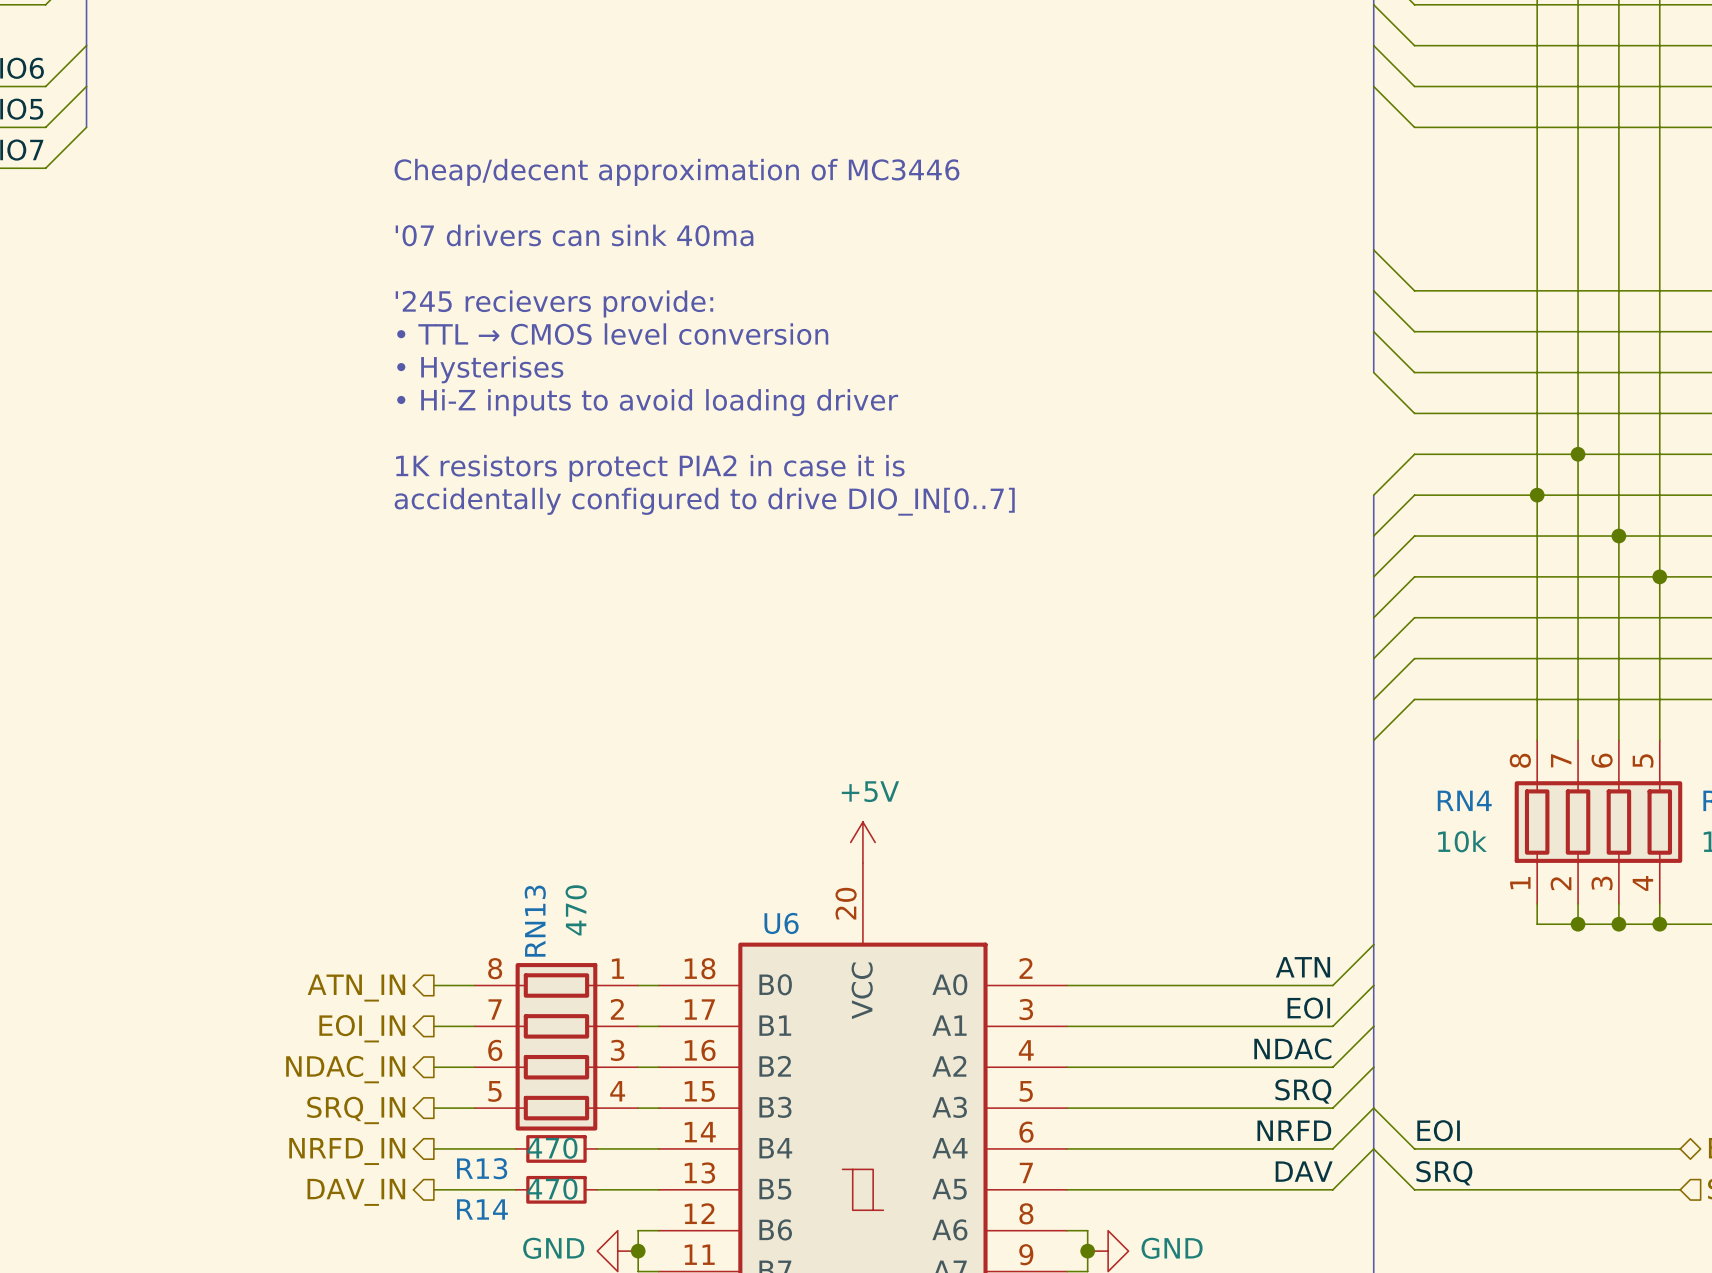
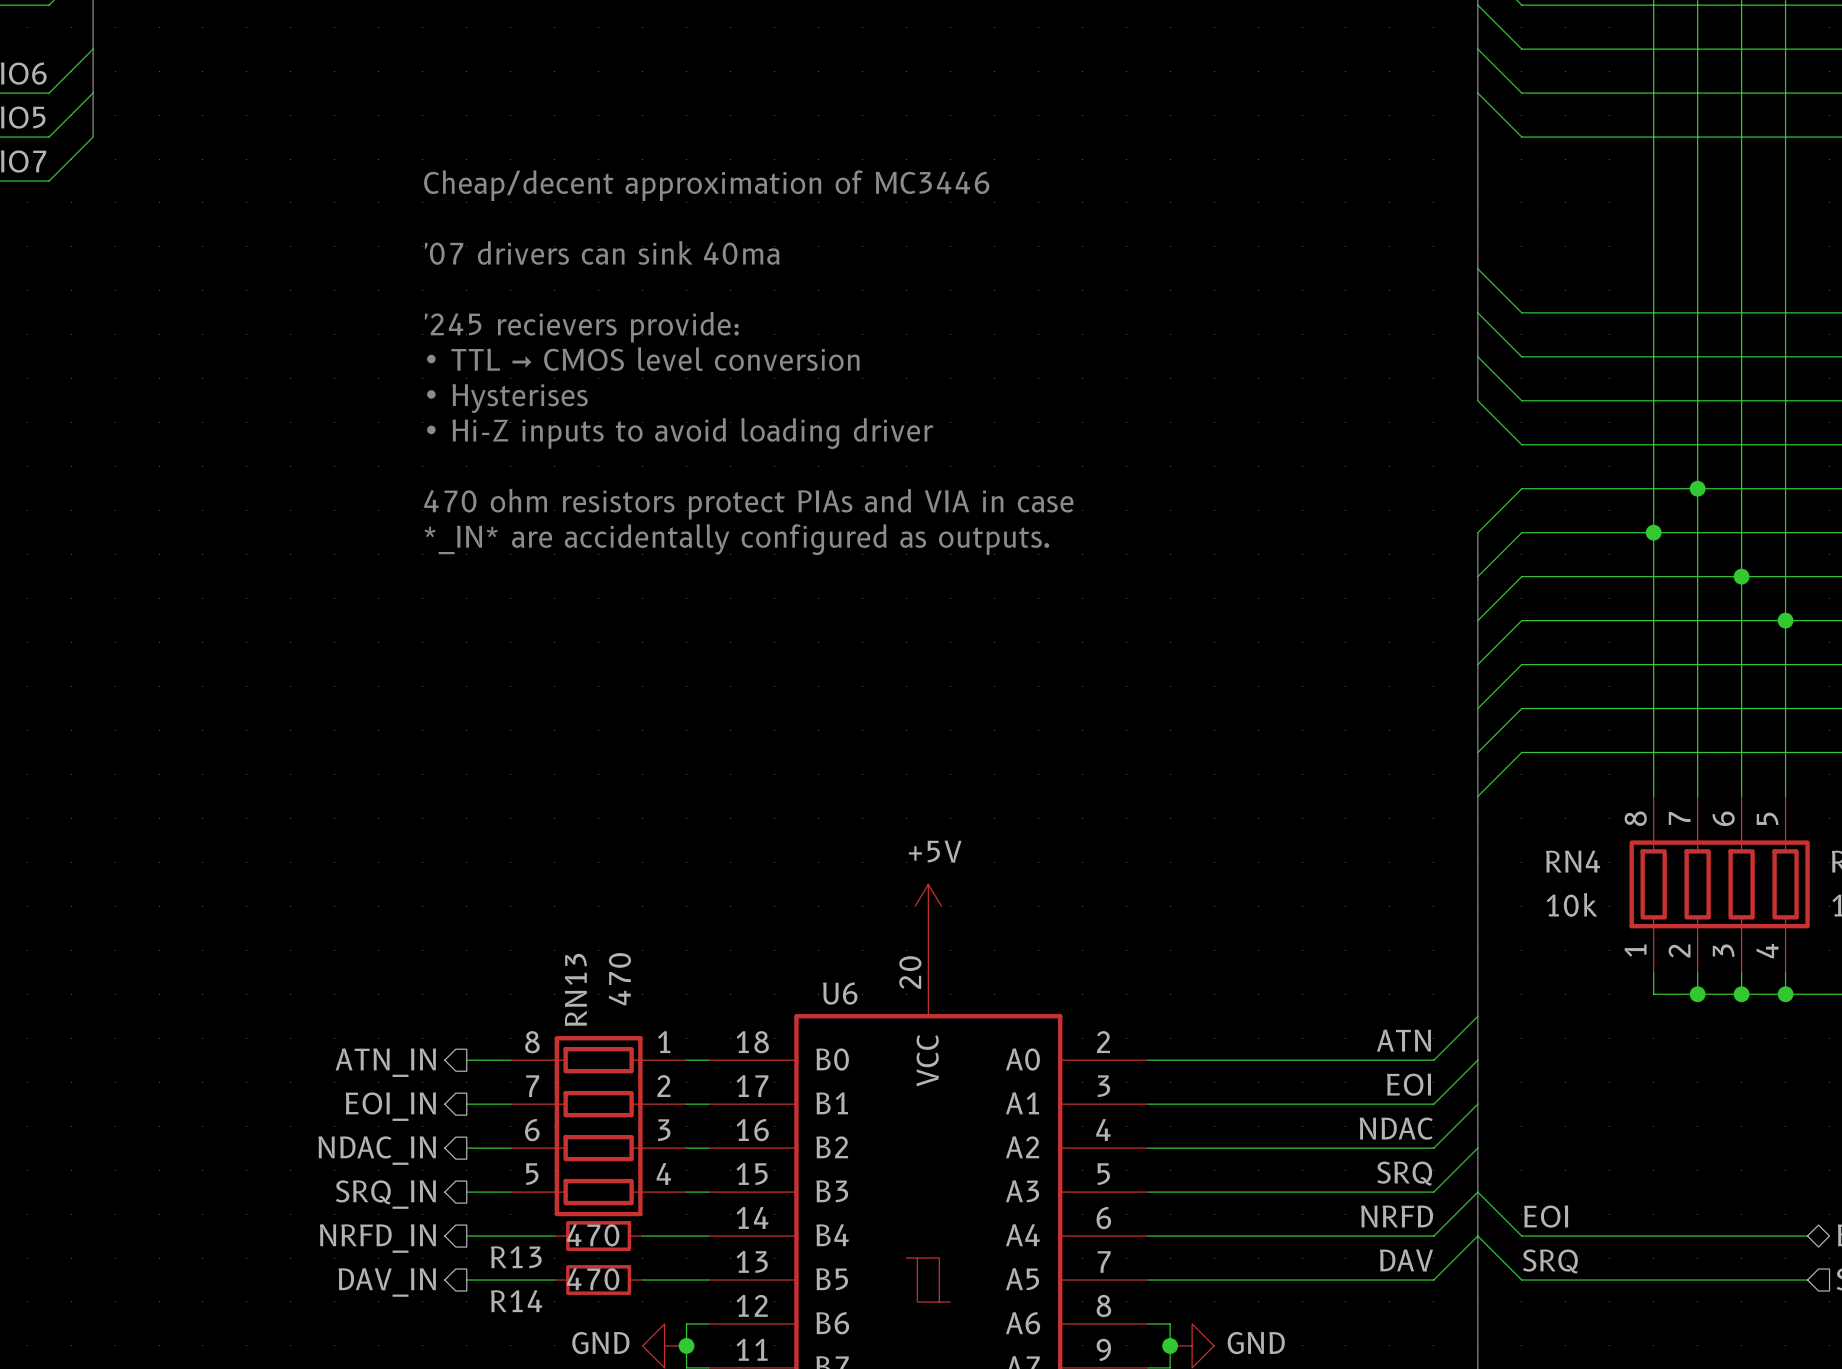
text: 1K resistors protect PIA2 in case it is (650, 468) -> 470 ohm resistors protect PIAs and VIA in case (748, 504)
text: accidentally configured to drive DIO_IN[0..7] (704, 501) -> *_IN* are accidentally configured as outputs. (736, 539)

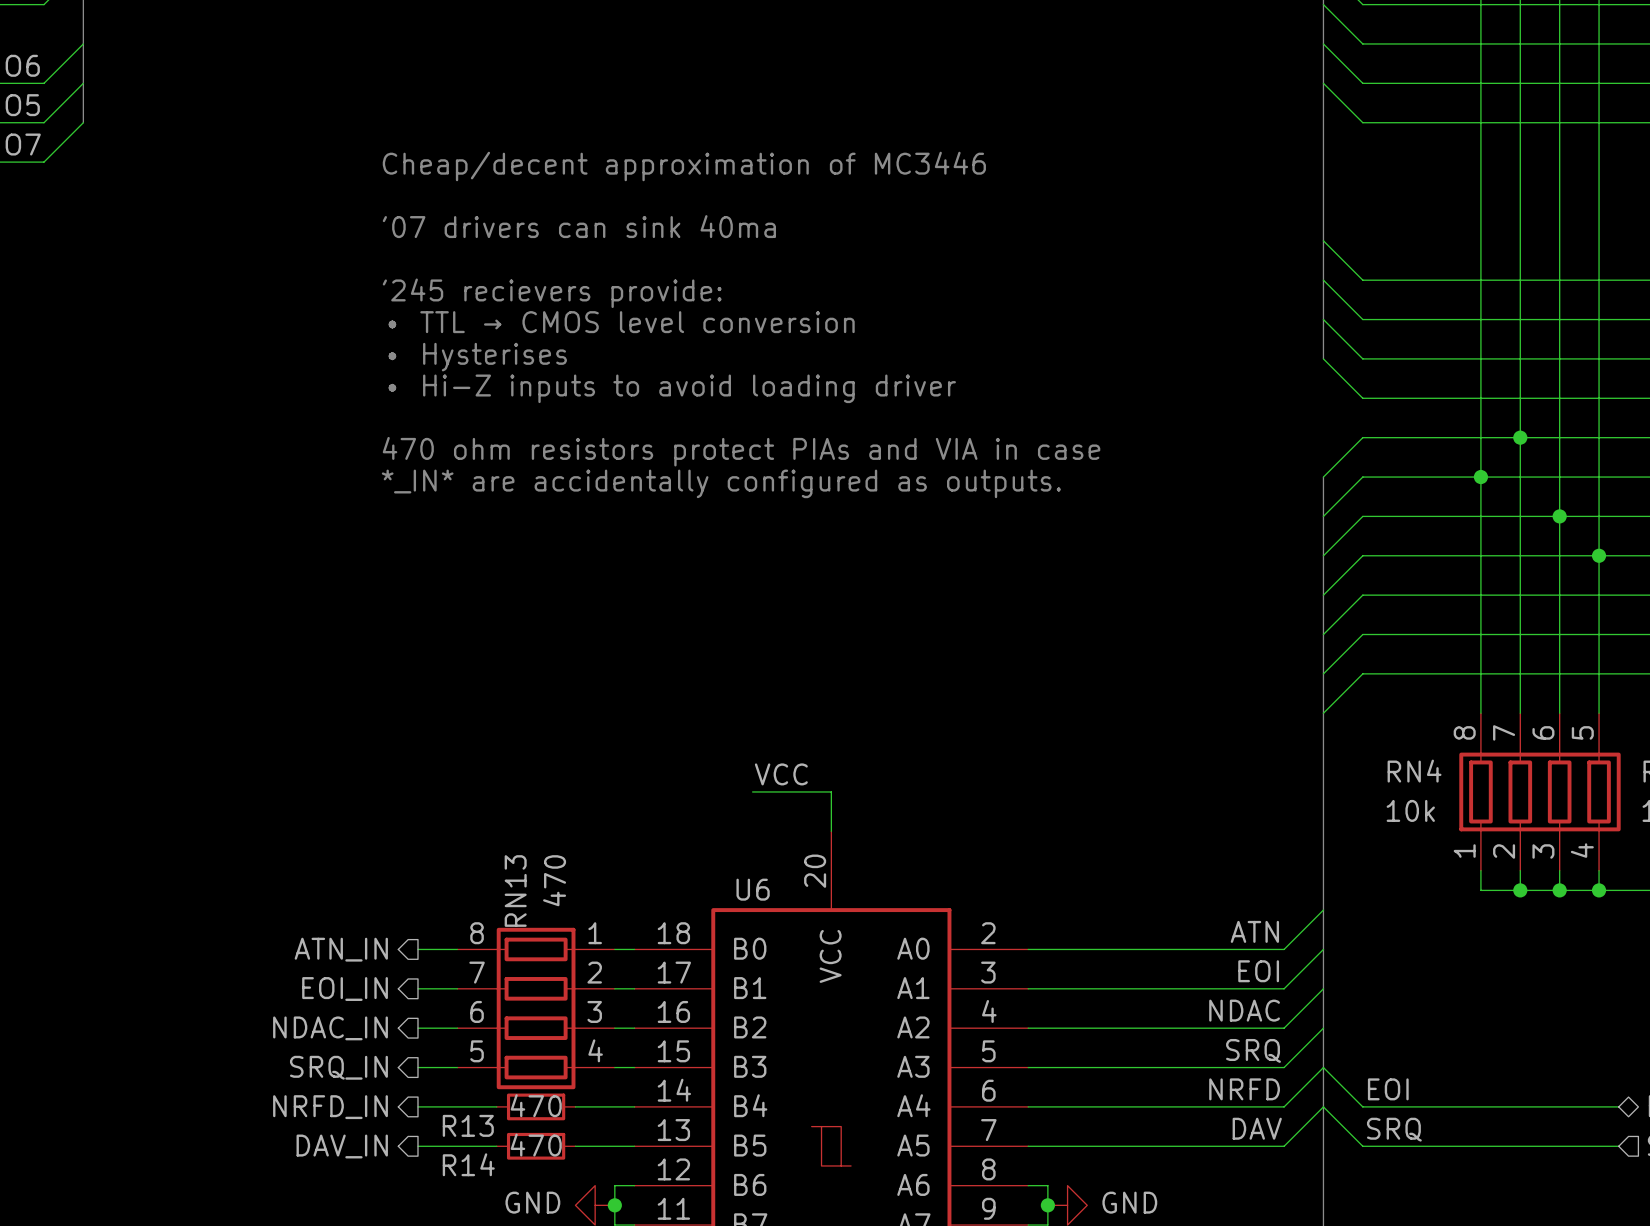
label: none -> VCC (781, 774)
wire: none -> (752, 791) (831, 791) (831, 831)
power symbol: +5V (928, 906) -> none

